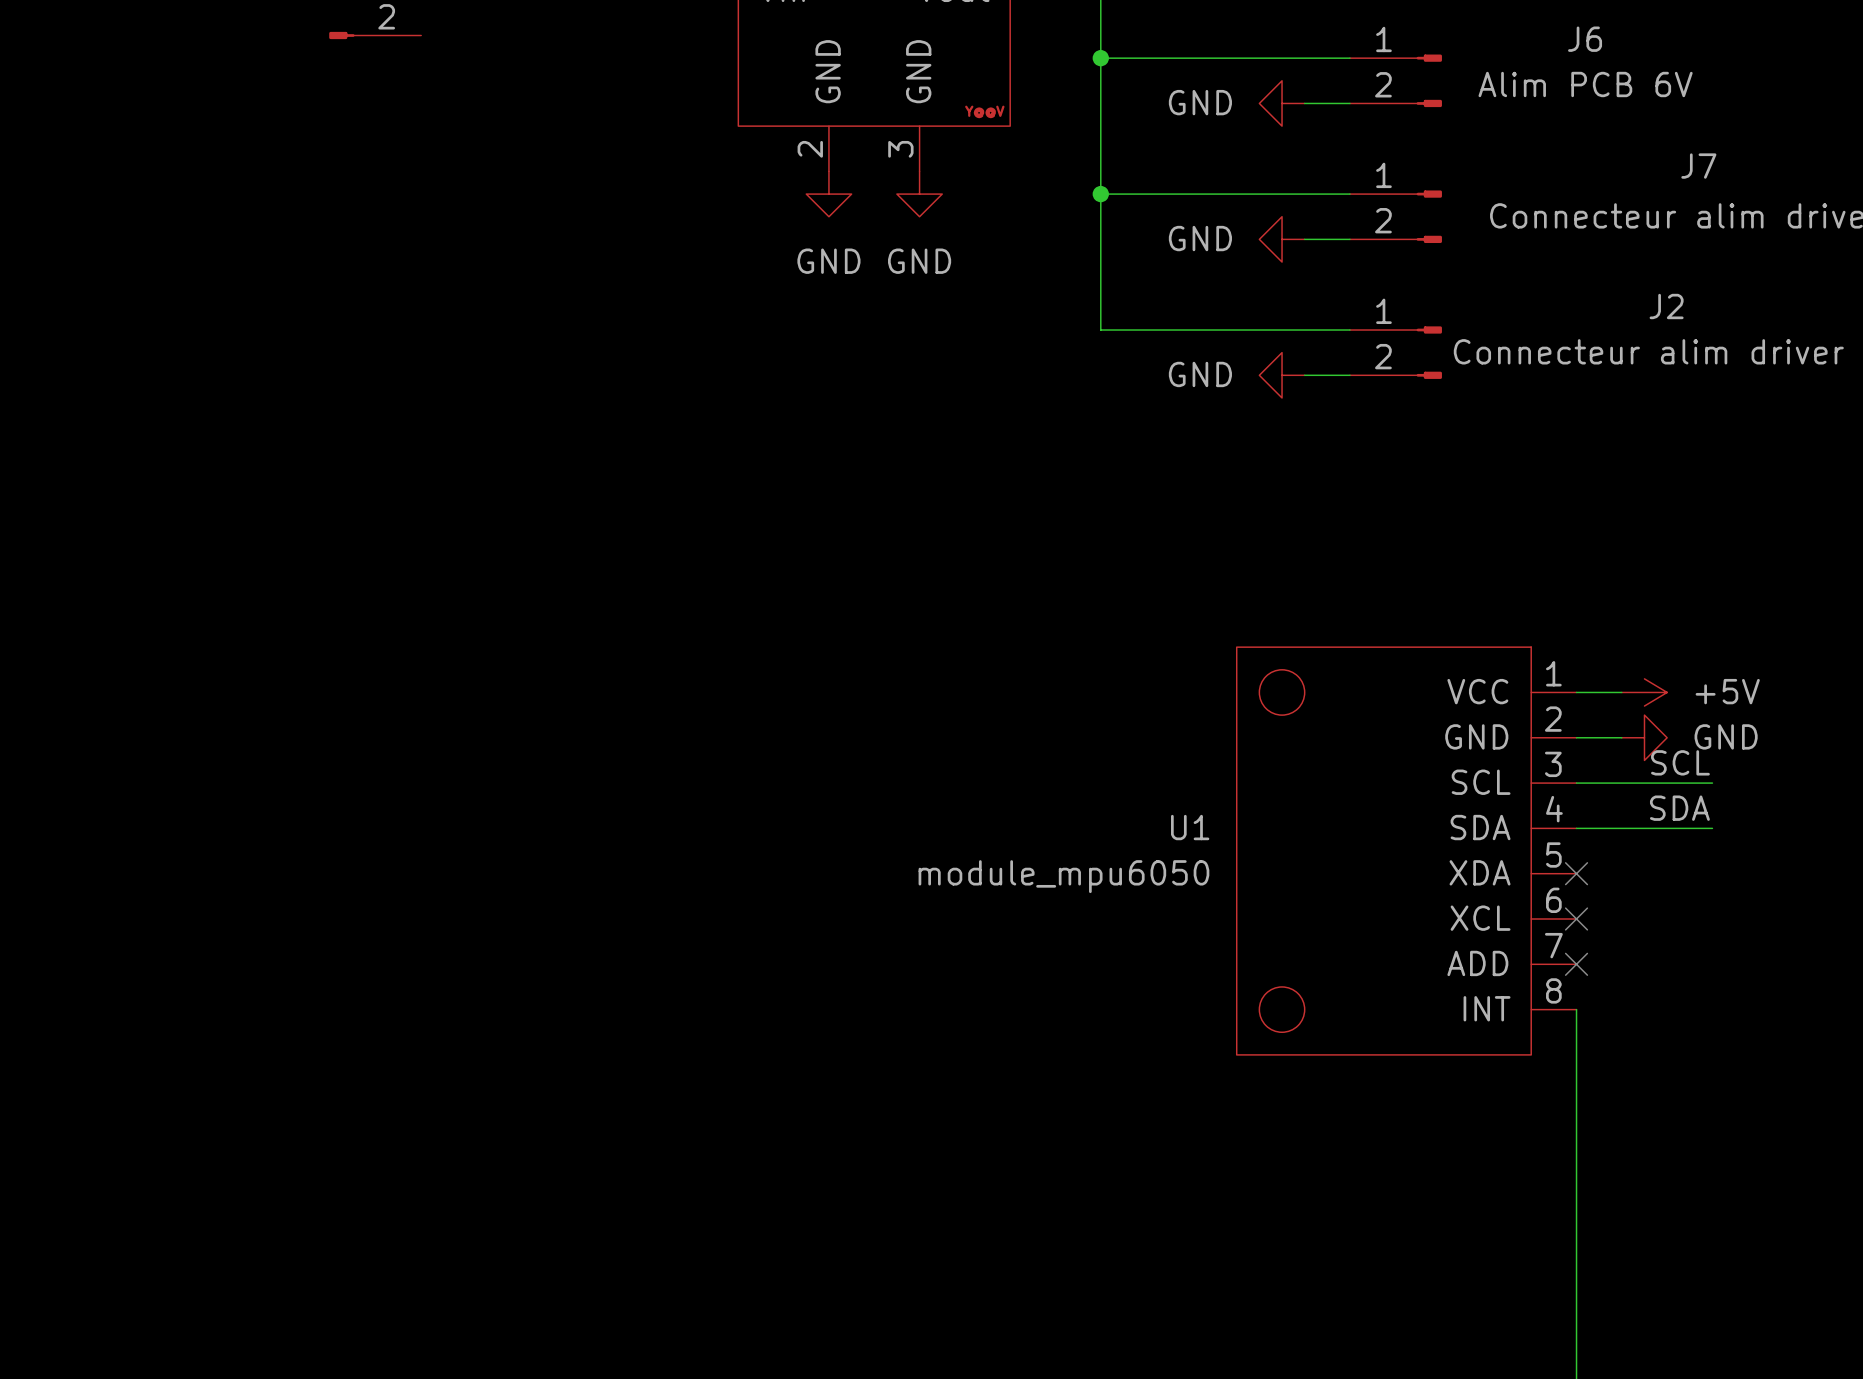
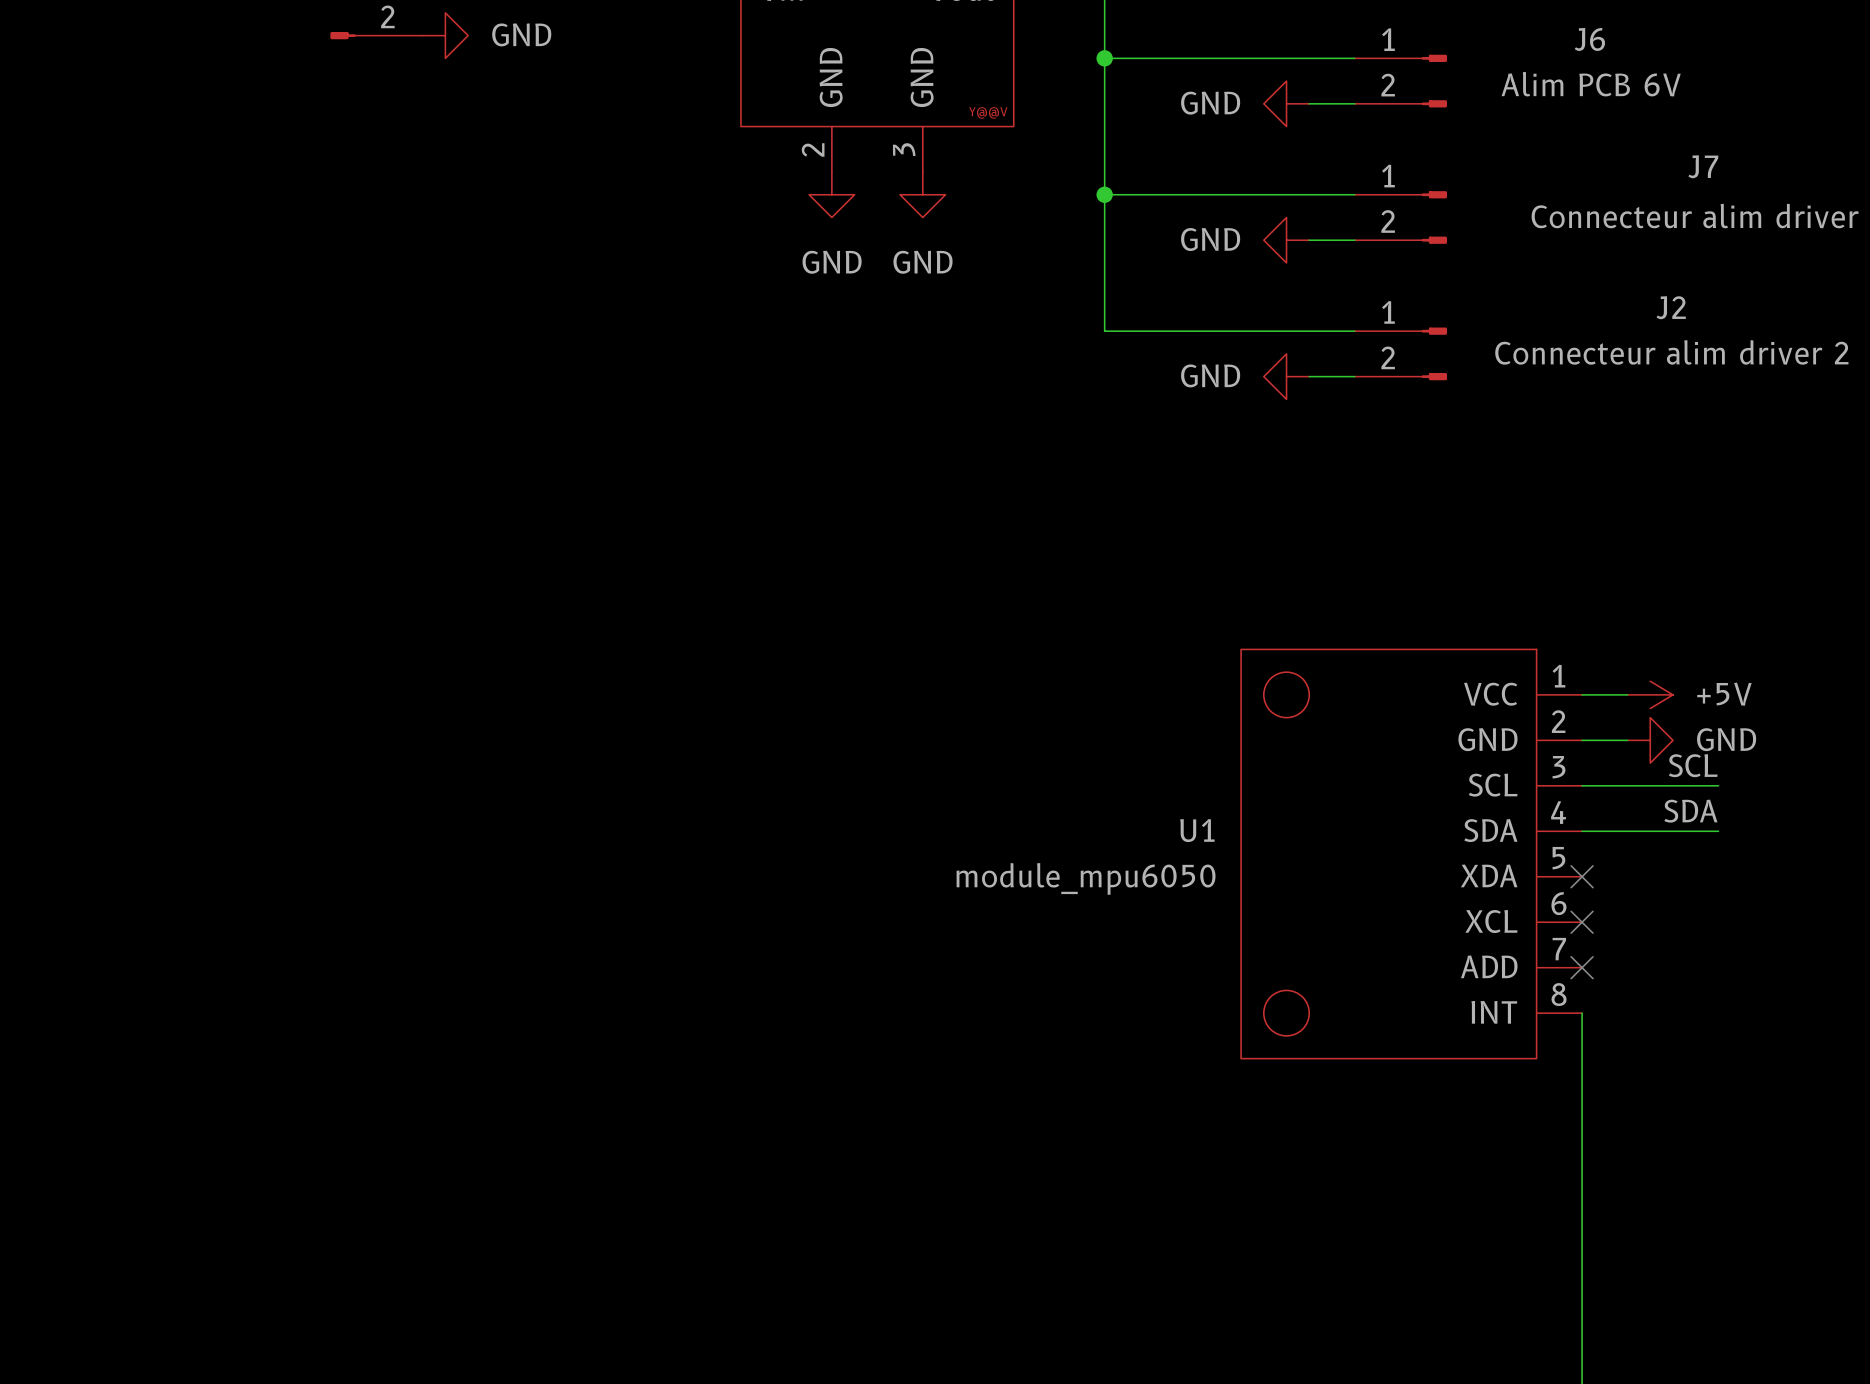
power symbol: none -> GND (445, 35)

